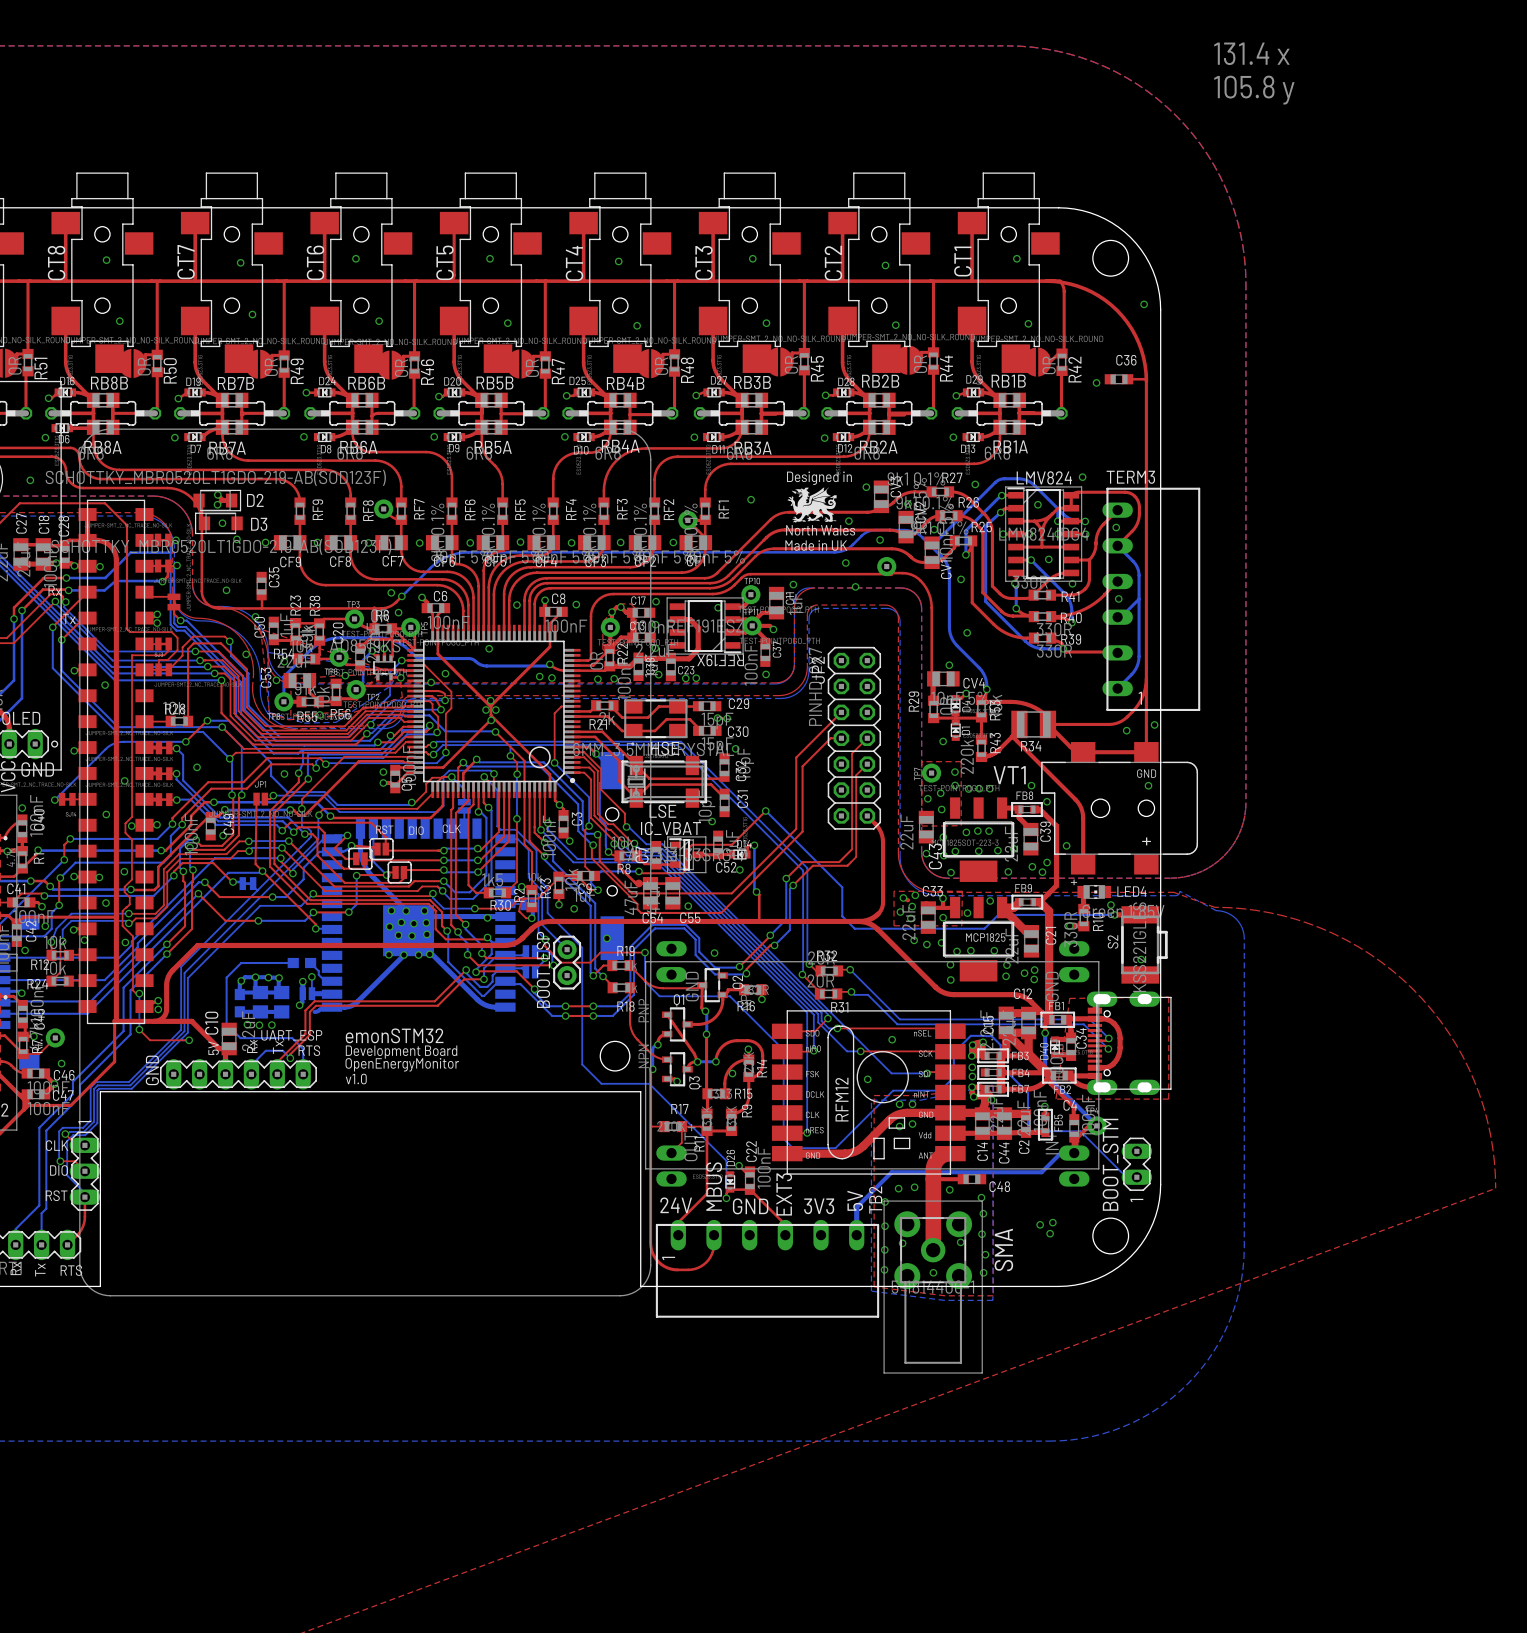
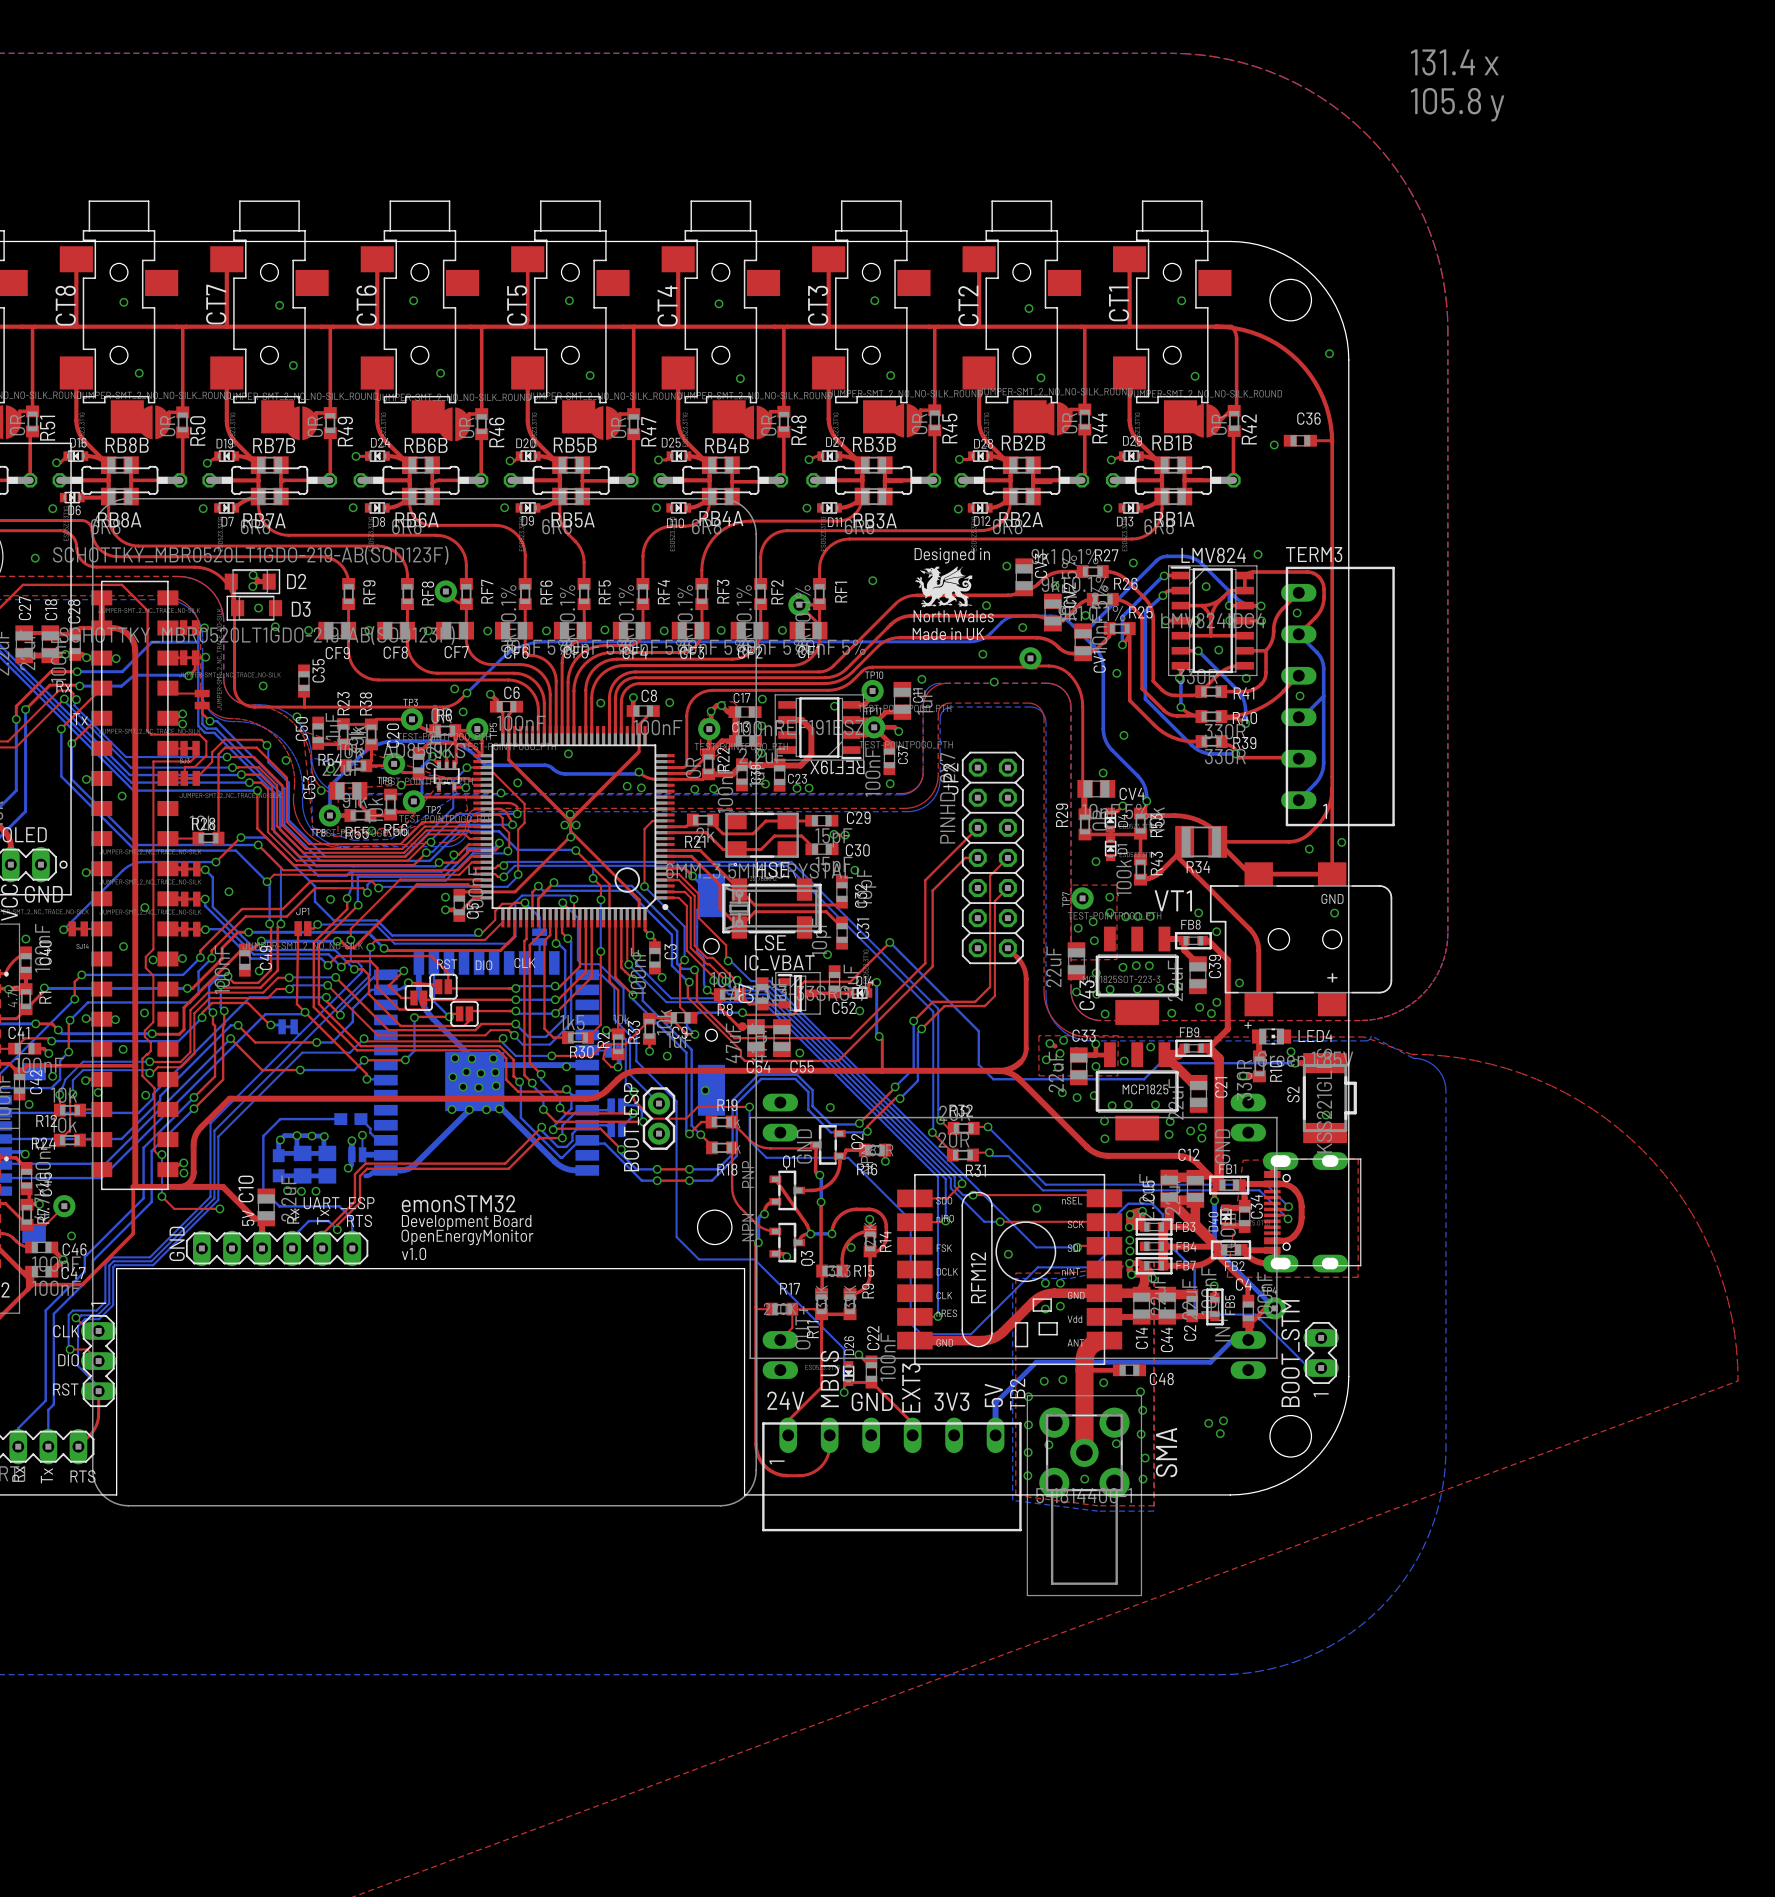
R43 value: 220k (967, 756) -> 100k (1124, 877)

